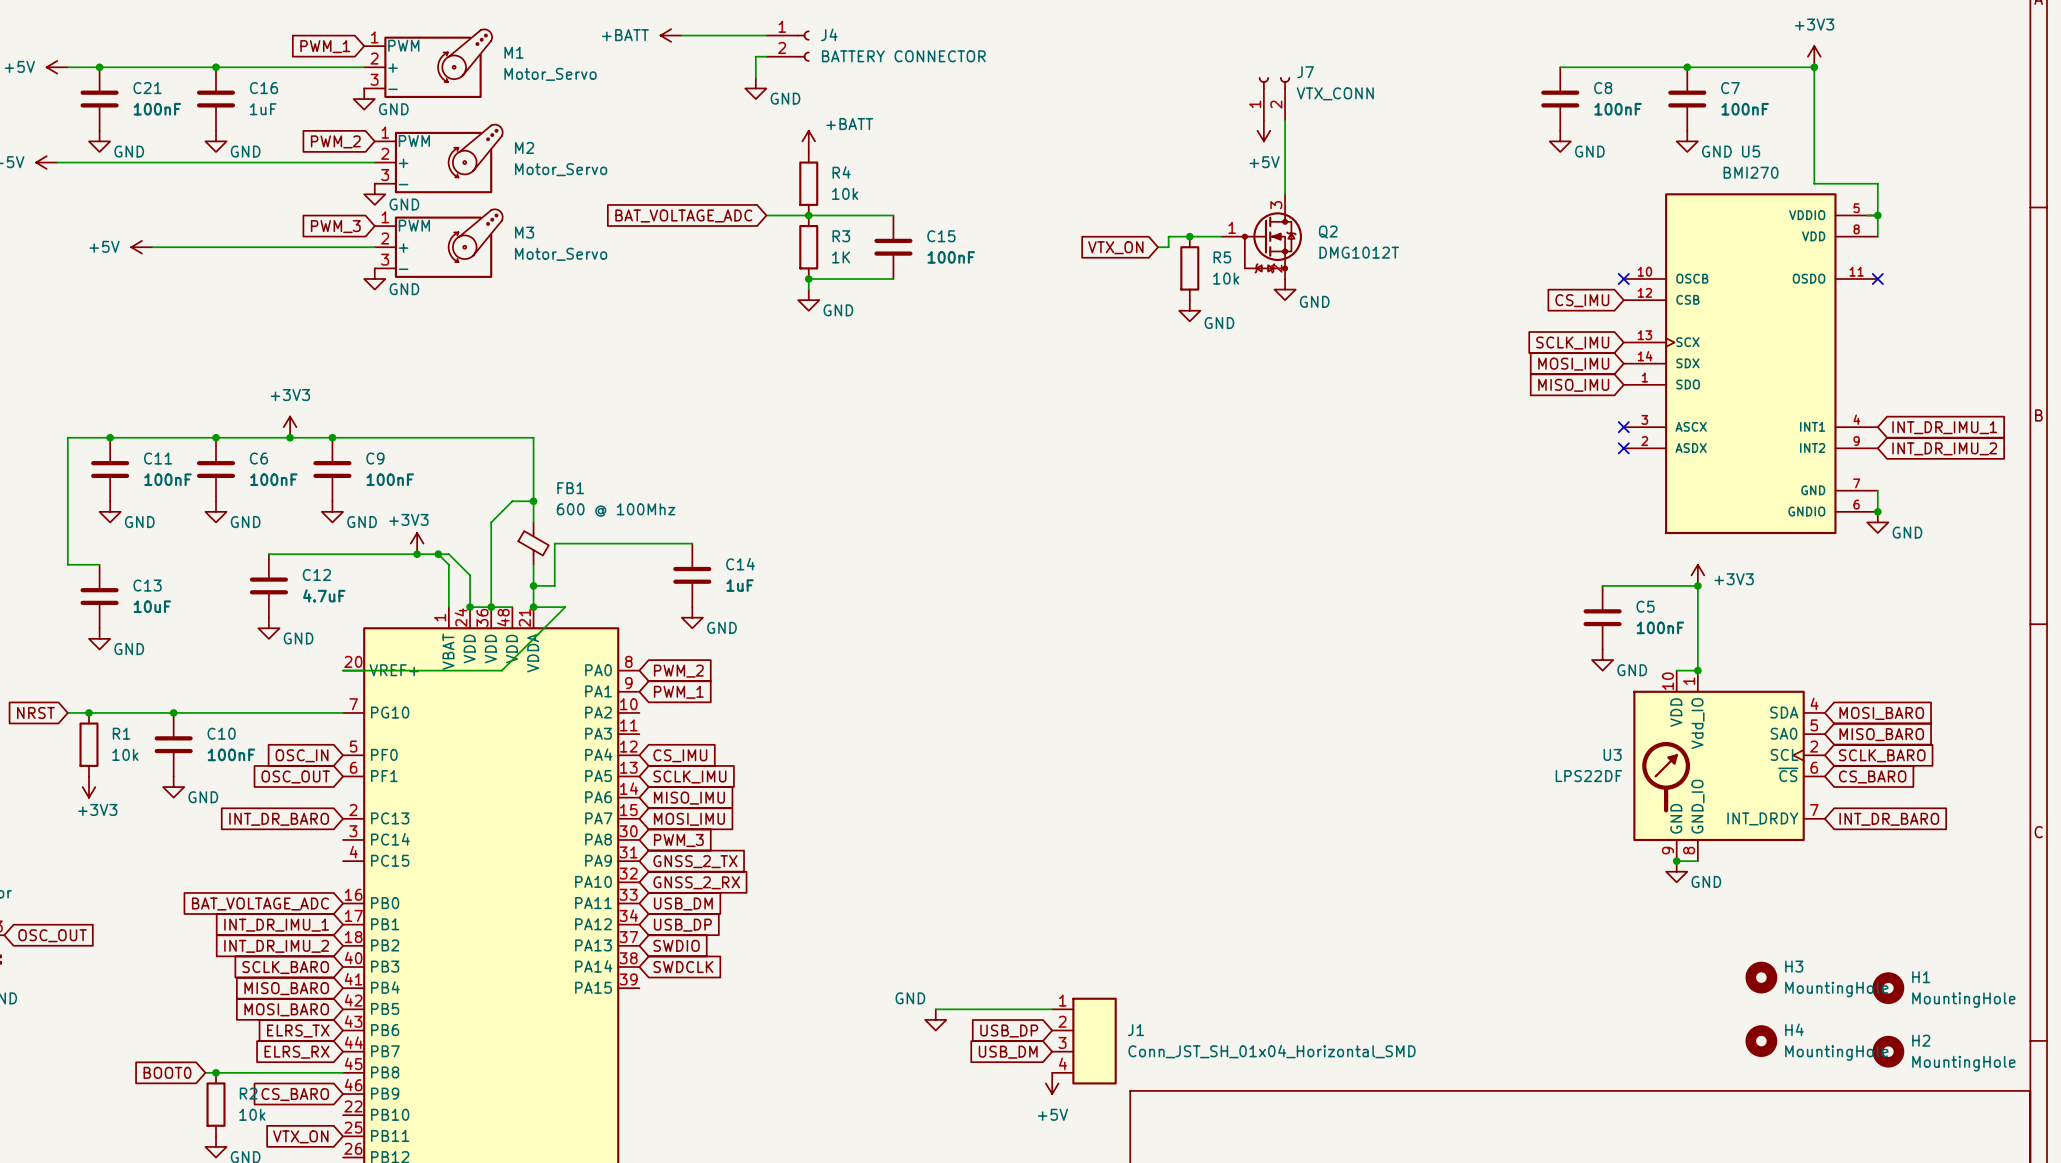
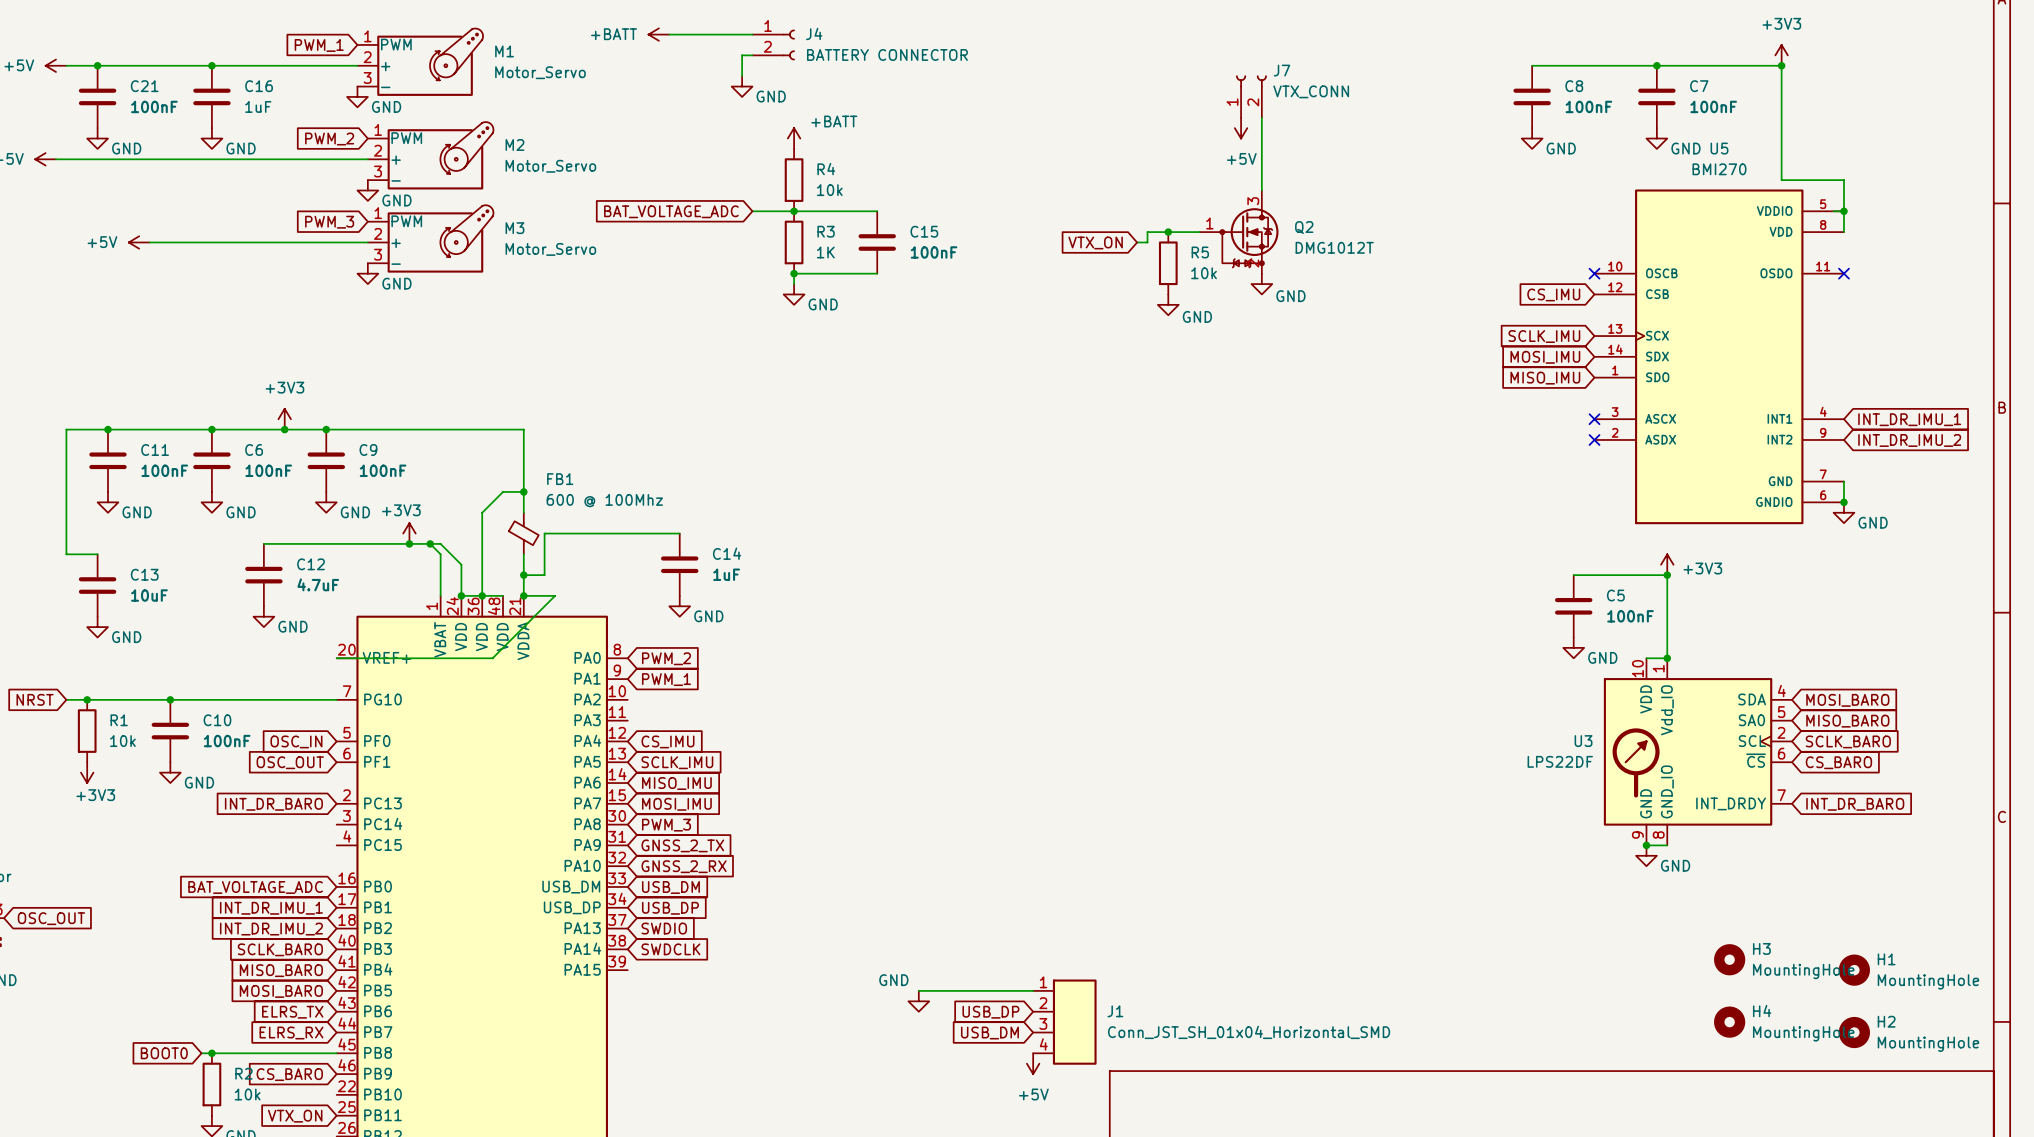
part pin name: PA11 (593, 903) -> USB_DM (571, 887)
part pin name: PA12 (593, 924) -> USB_DP (572, 907)

